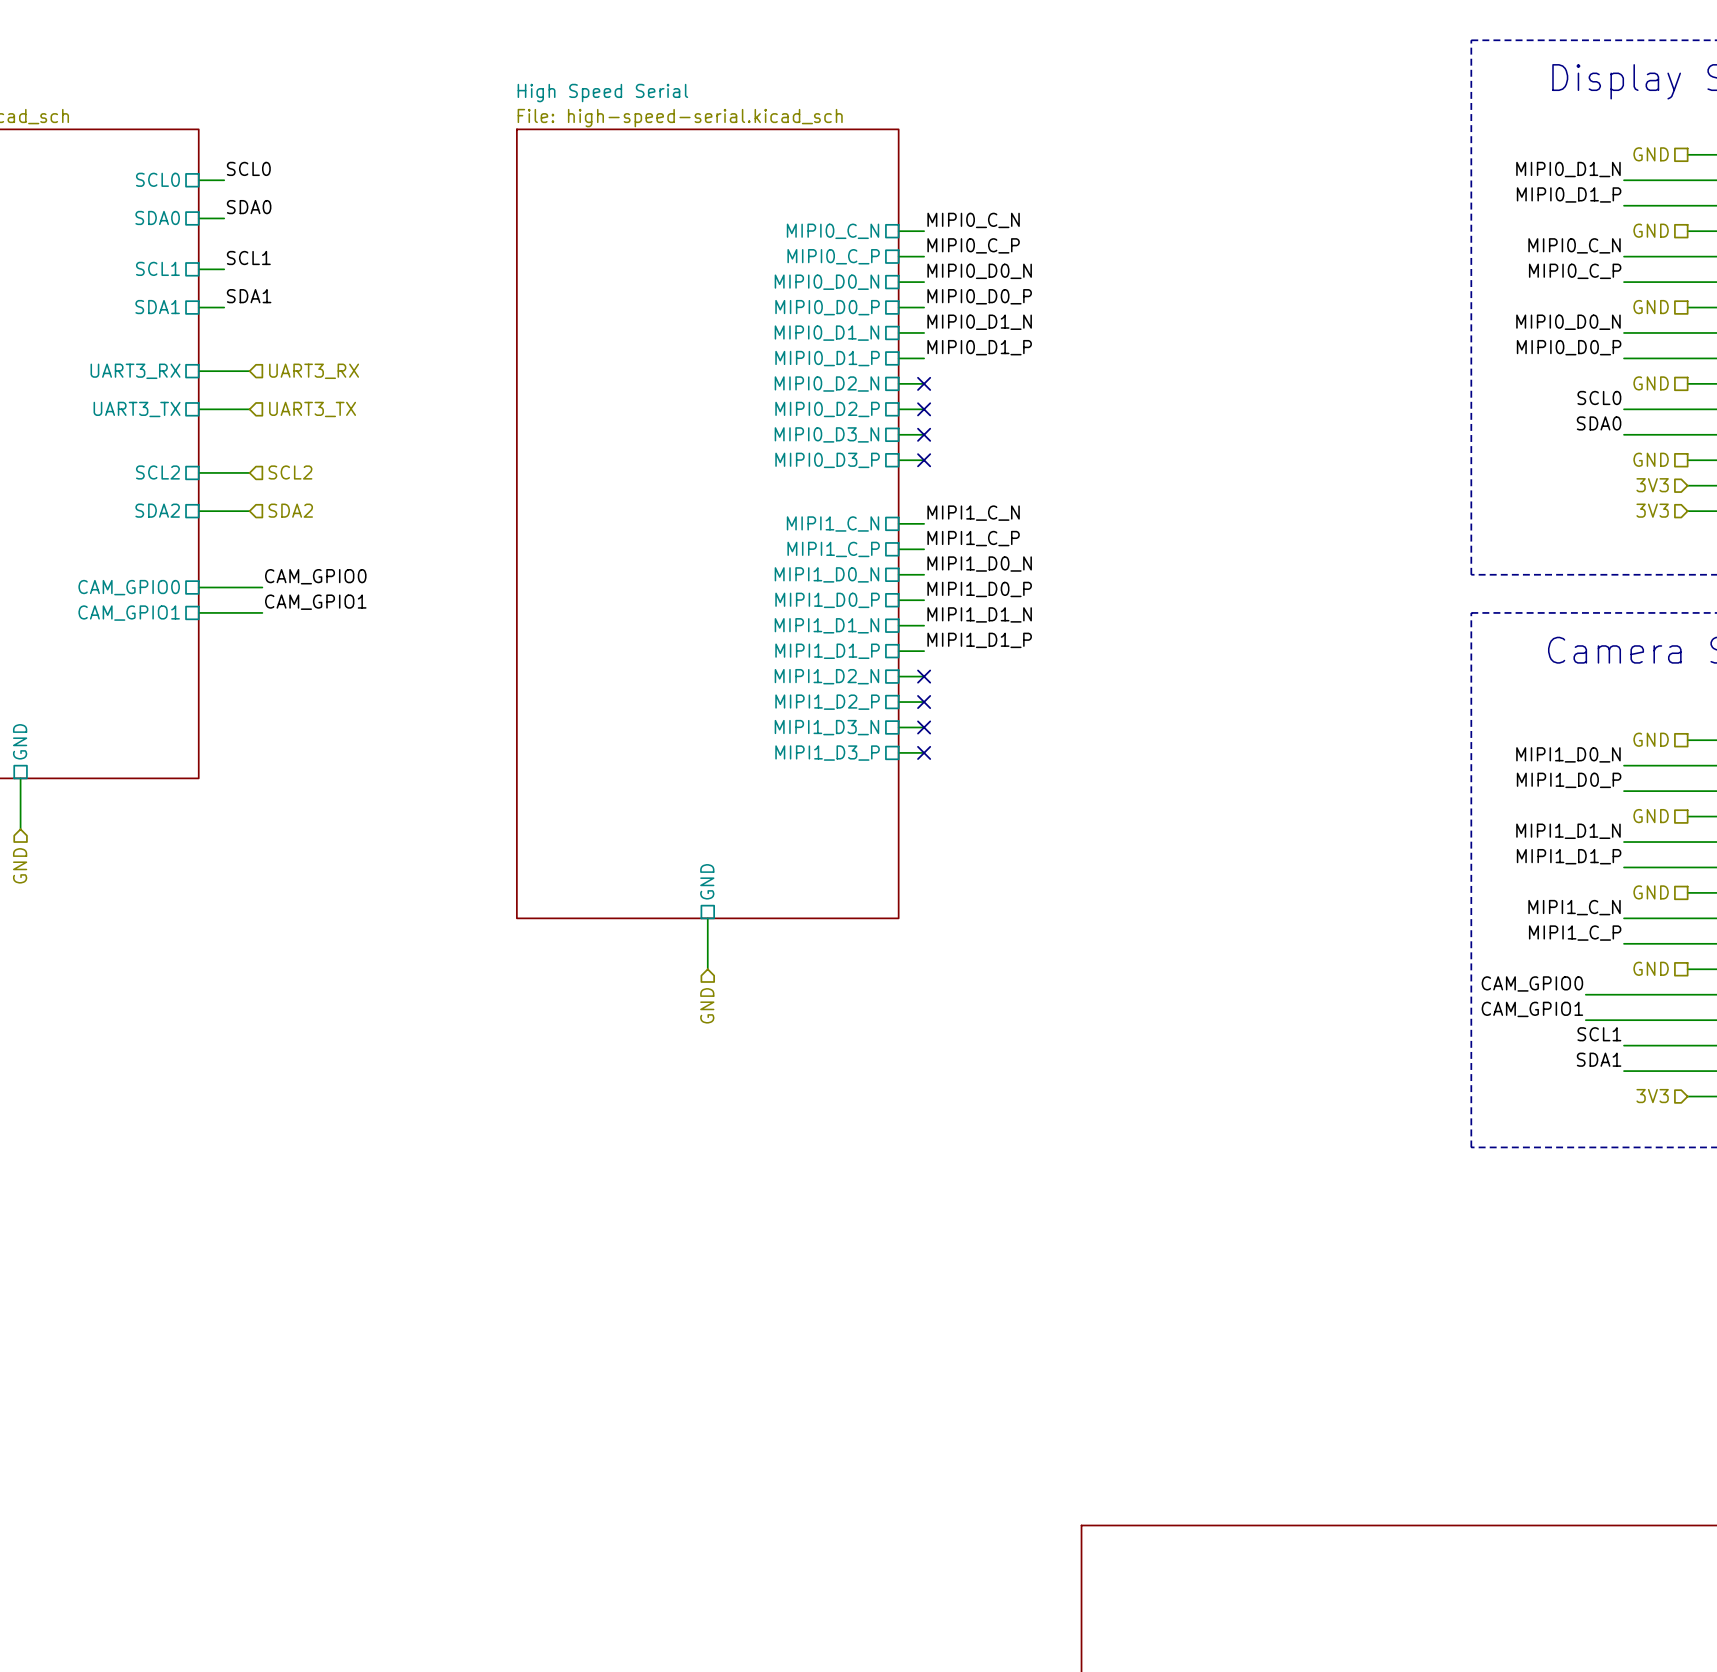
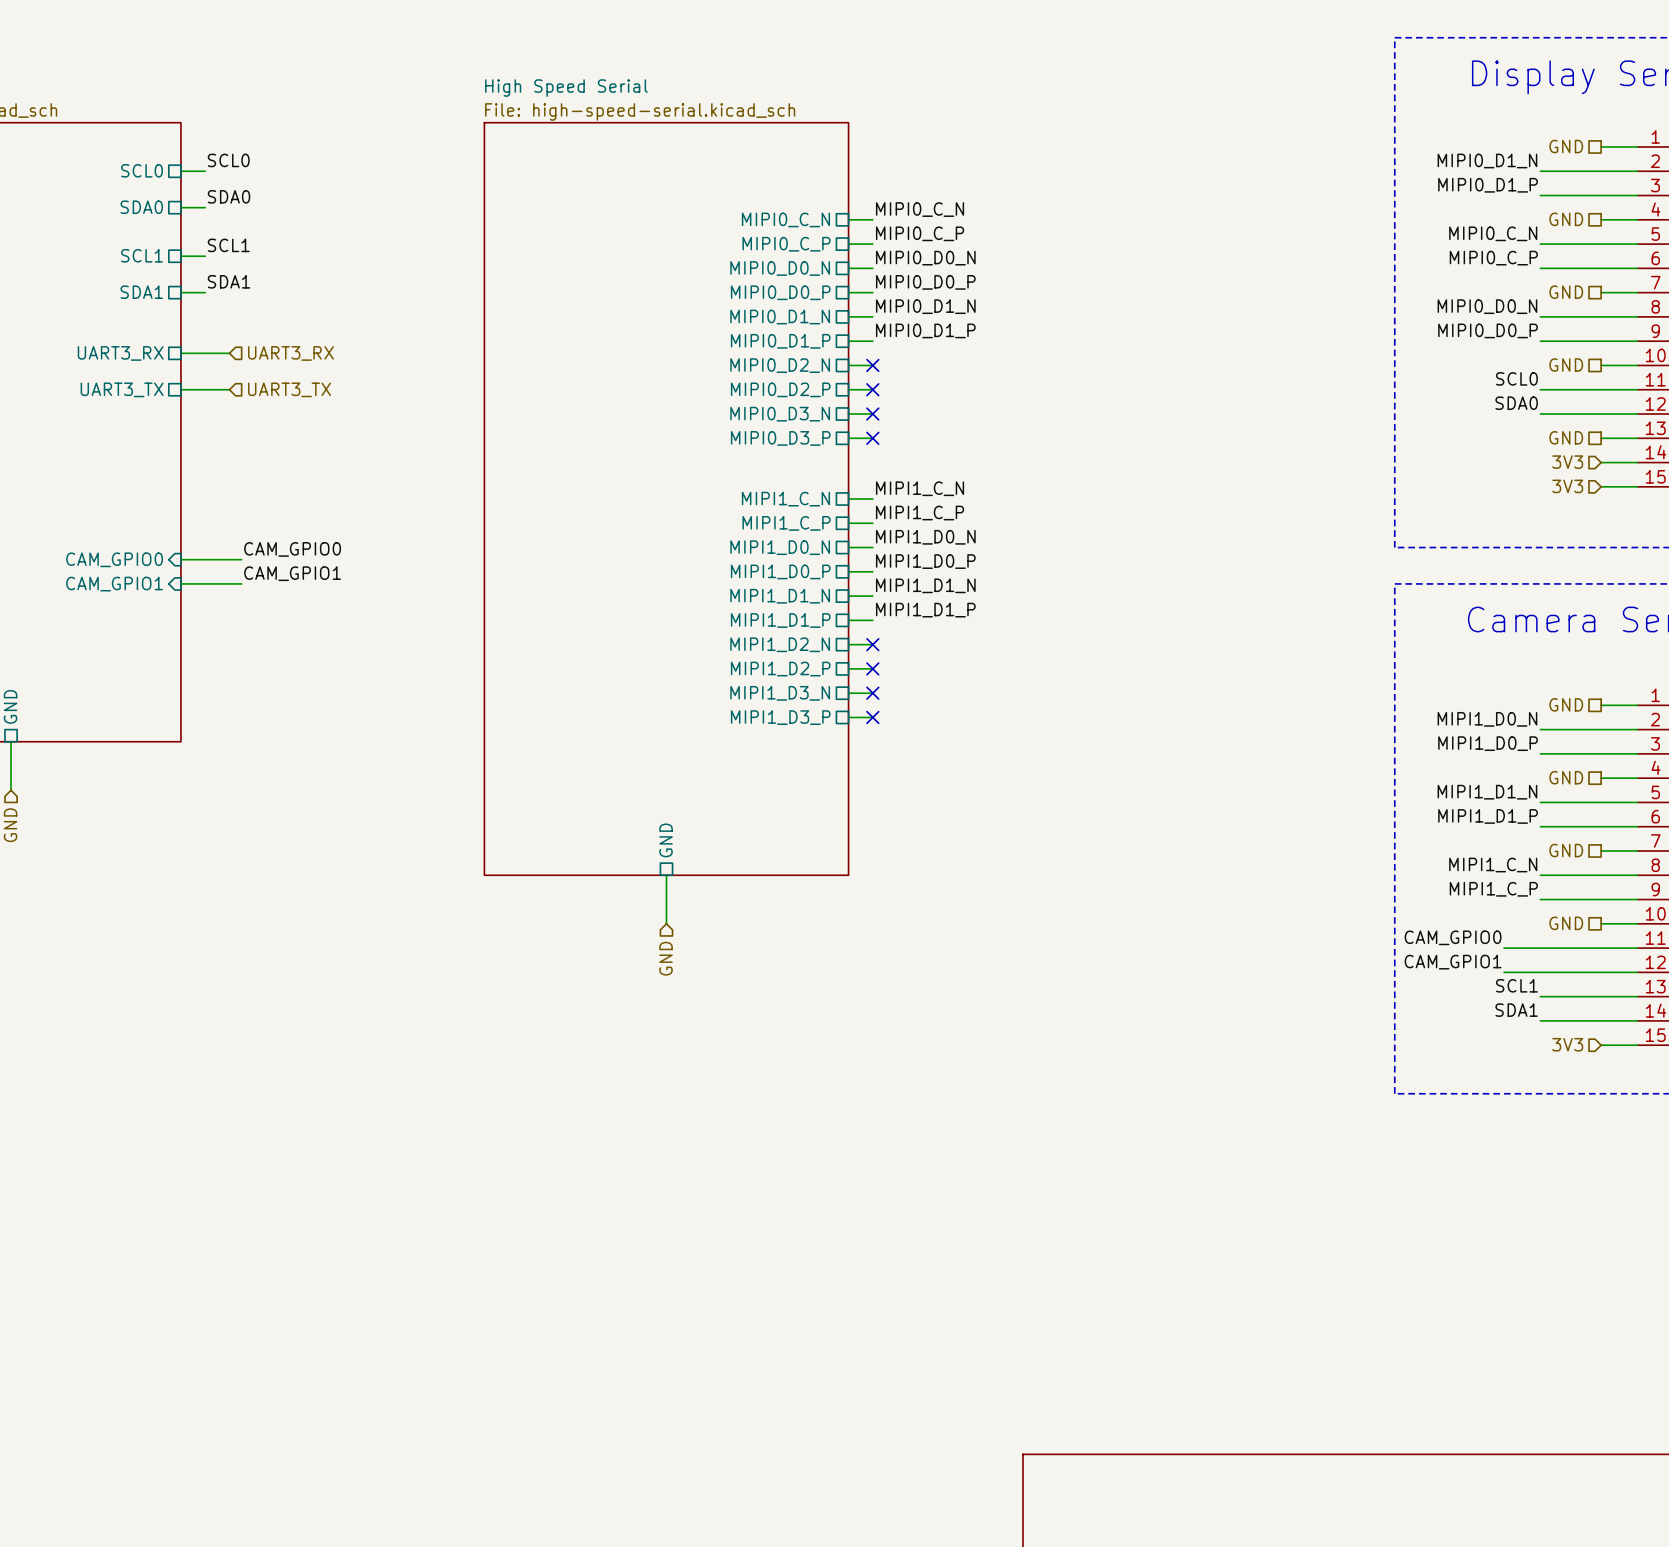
sheet pin: SCL2 (157, 472) -> none
wire: (198, 472) (249, 472) -> none
hierarchical label: SCL2 (290, 472) -> none
sheet pin: SDA2 (157, 510) -> none
hierarchical label: SDA2 (290, 510) -> none
wire: (198, 511) (249, 511) -> none
sheet pin shape: passive (129, 587) -> input (114, 559)
sheet pin shape: passive (129, 613) -> input (114, 584)

